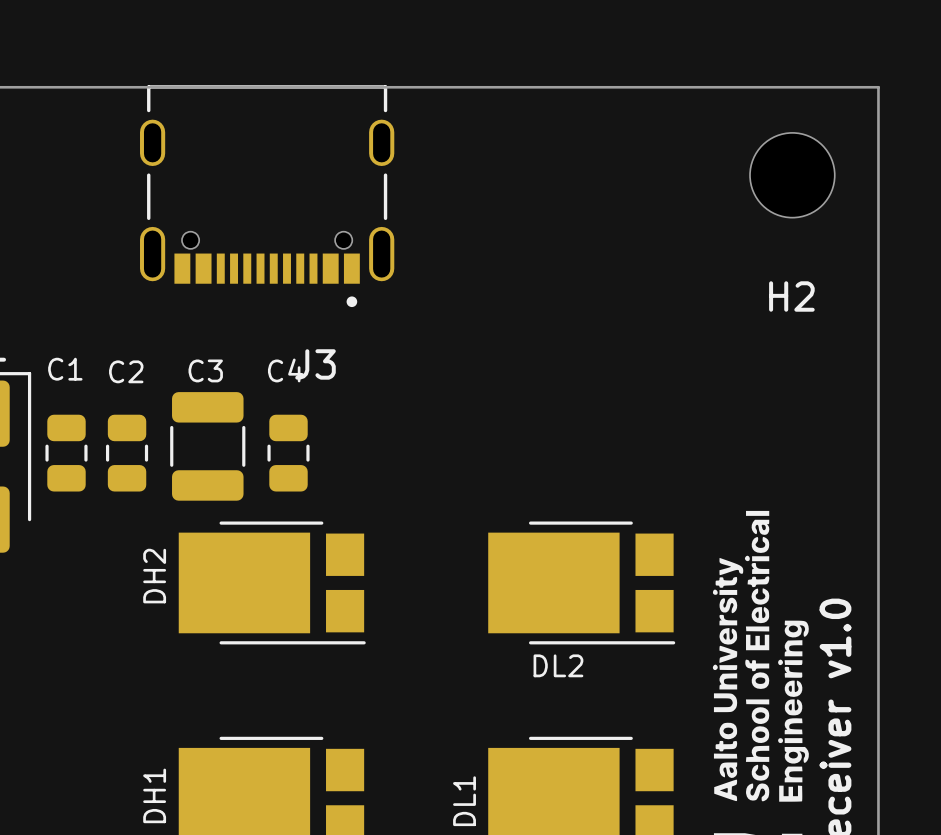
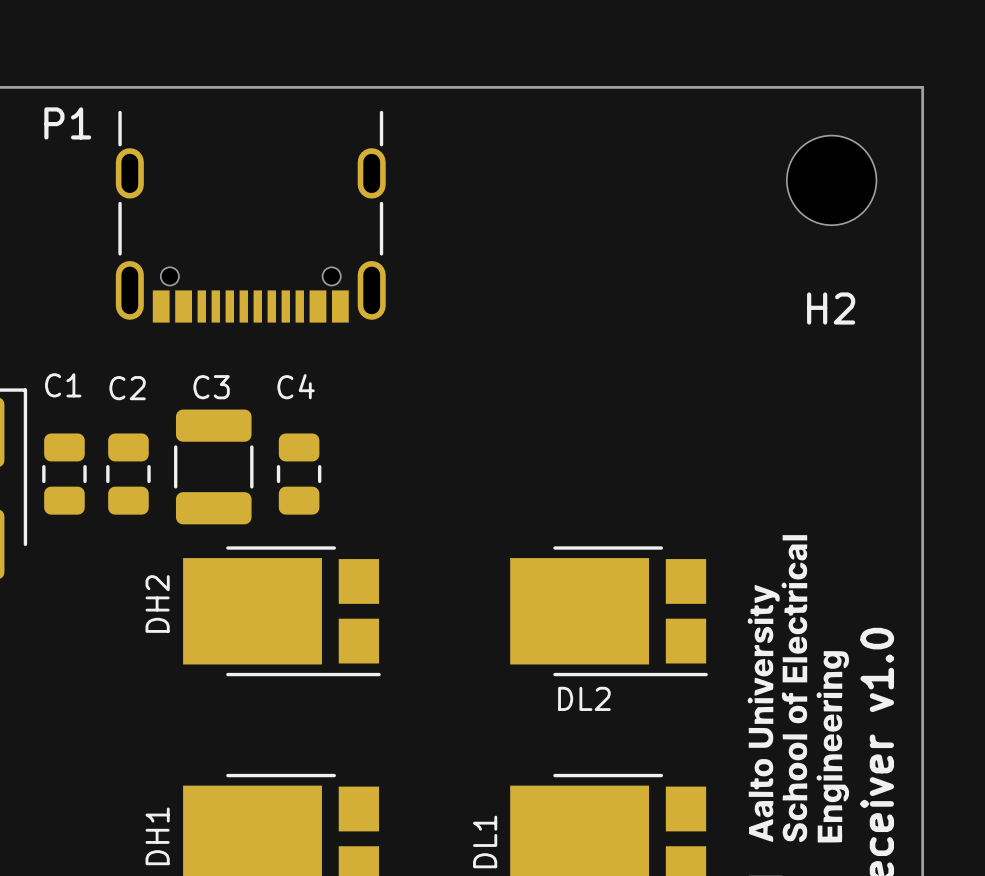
J3: (267, 196) -> none
P1: none -> (250, 216)

